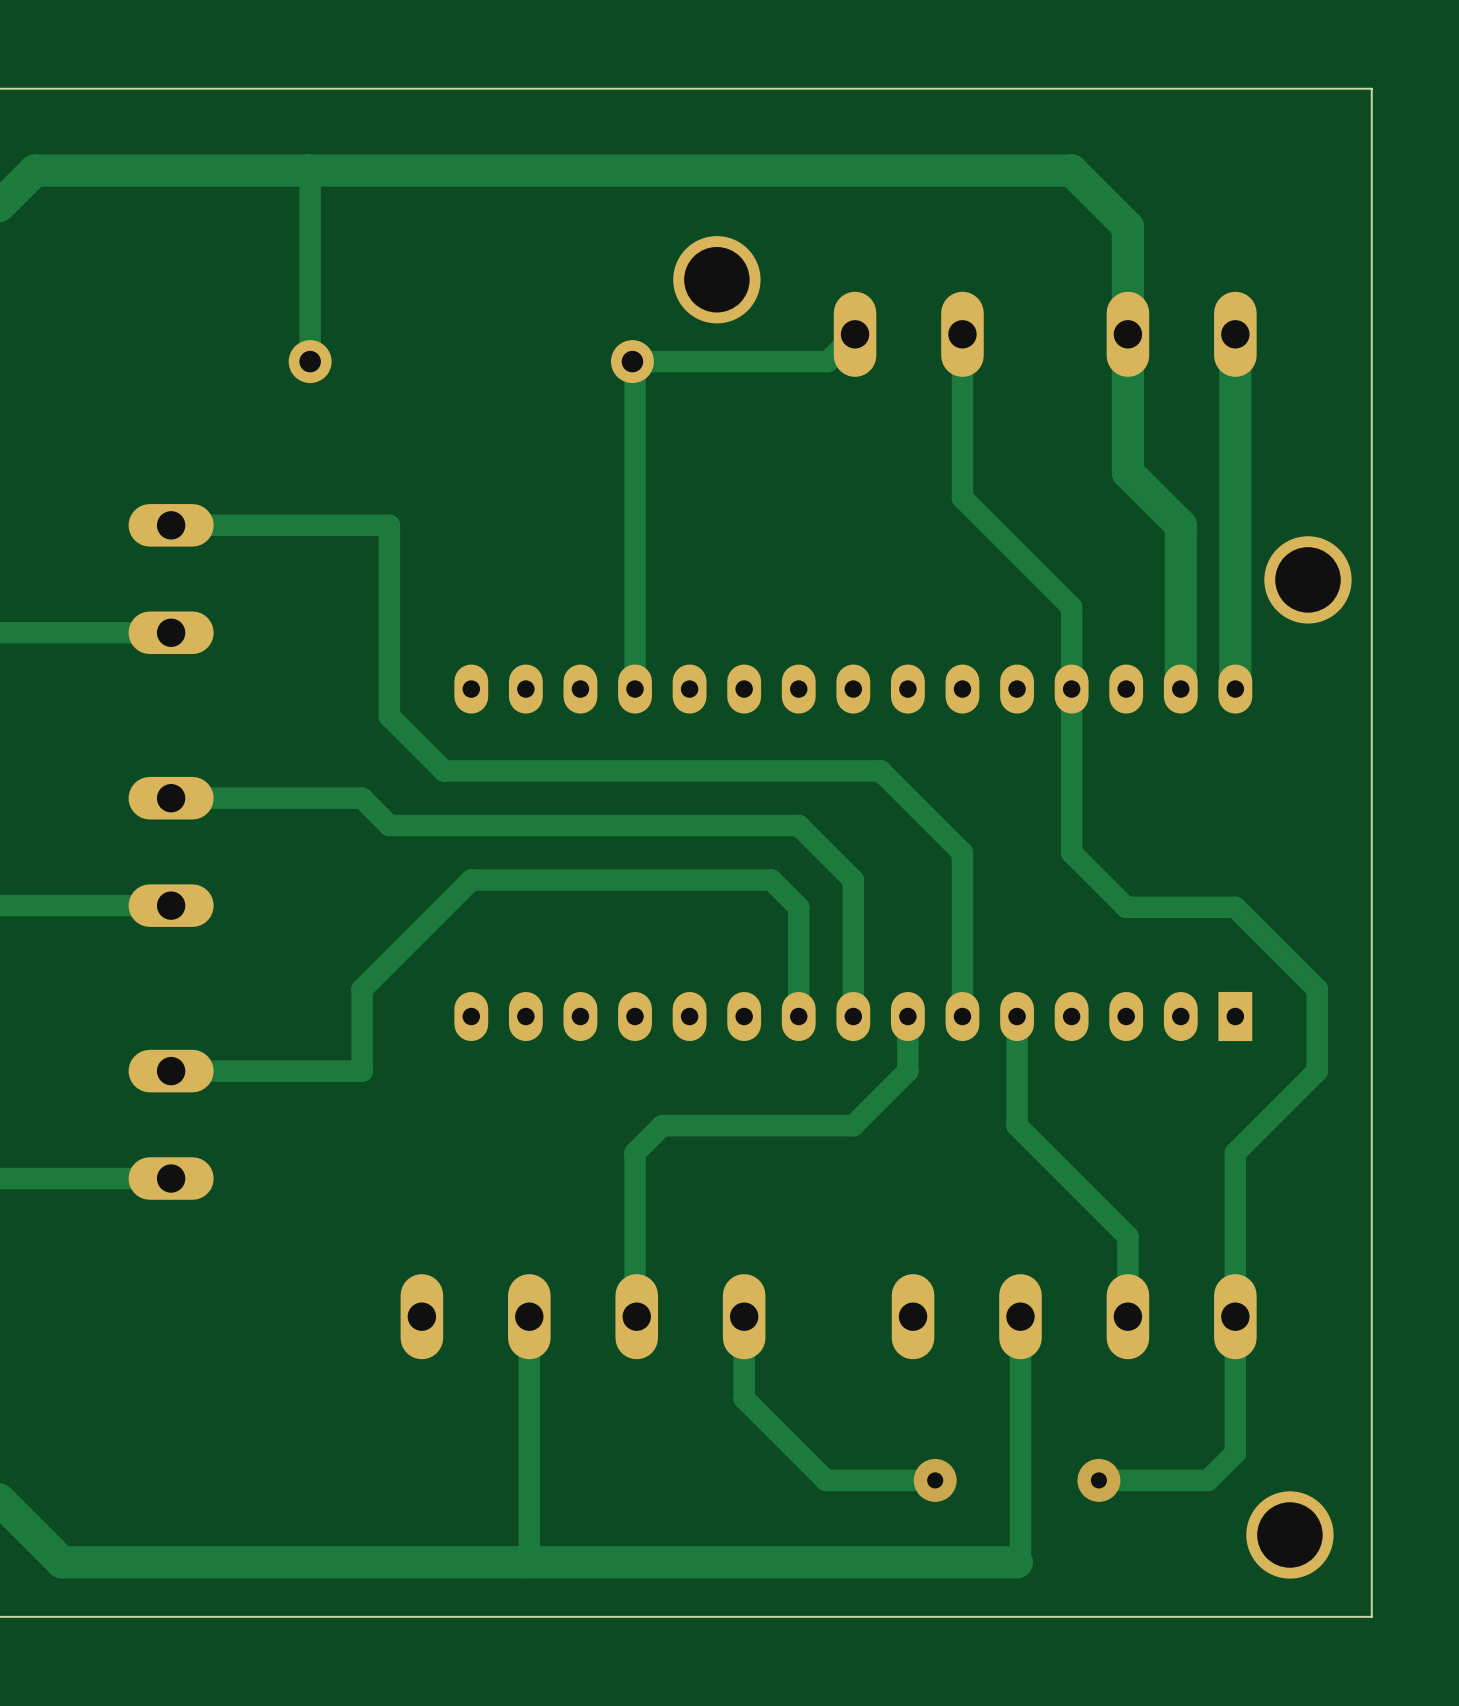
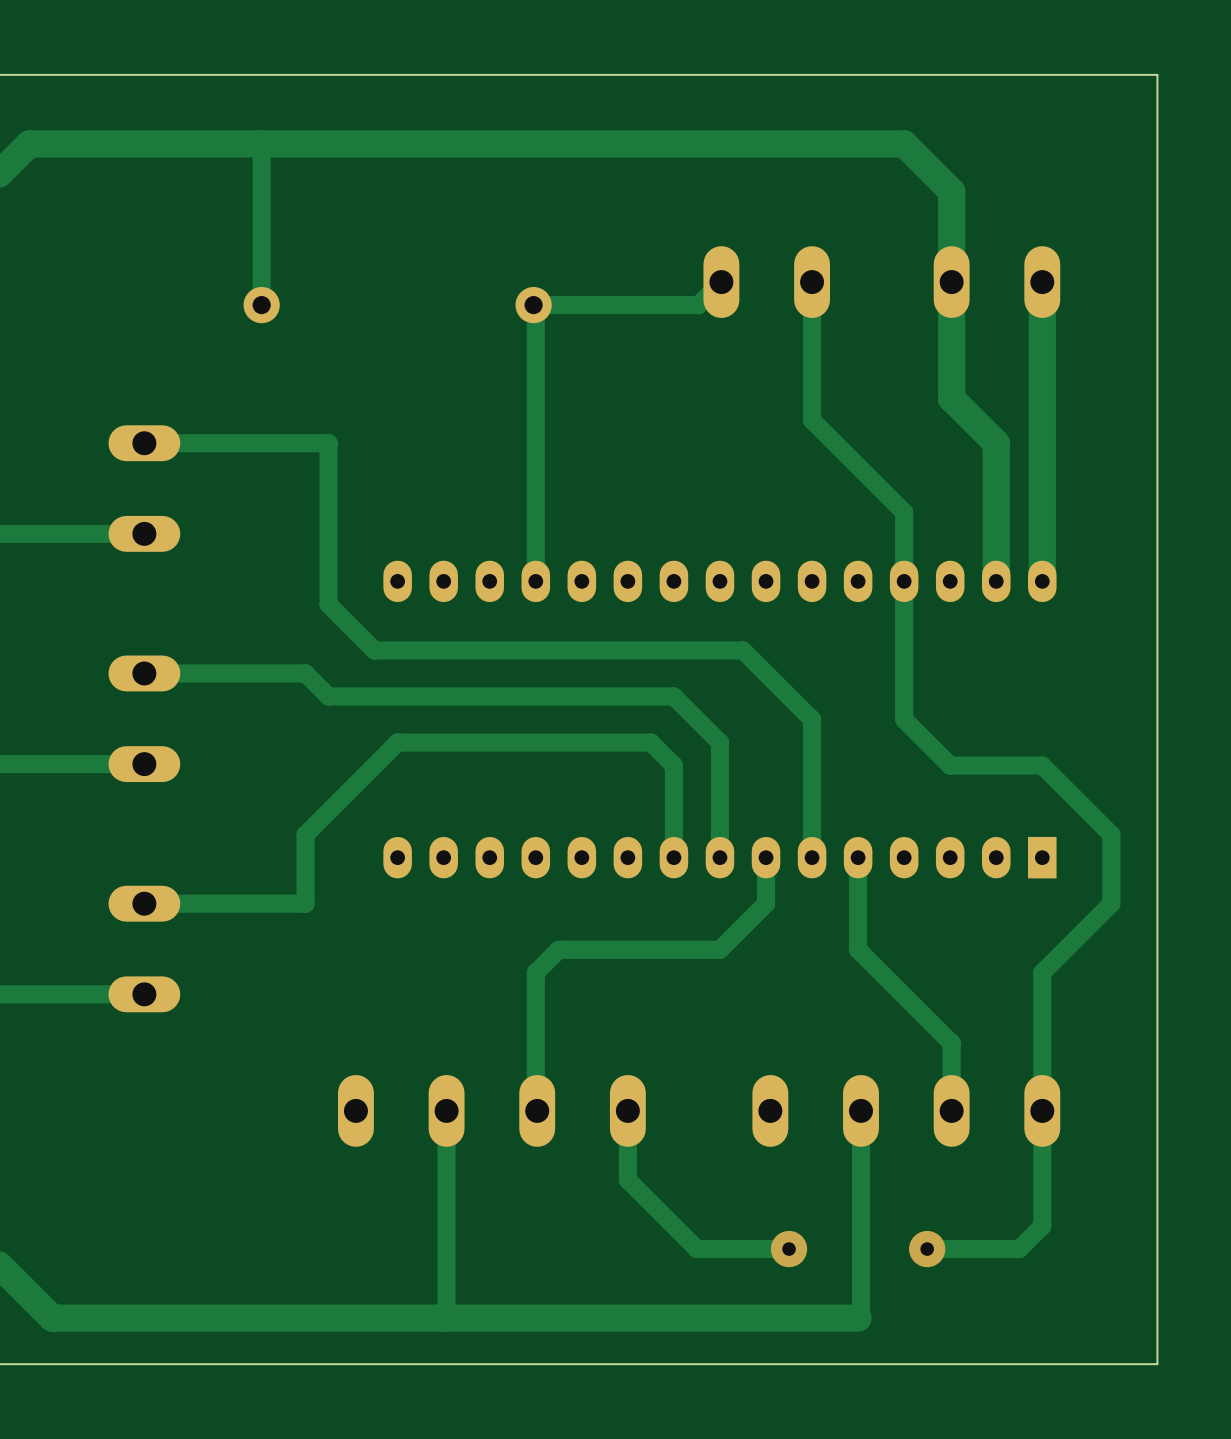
part: (716, 279) -> none
part: (1307, 579) -> none
part: (1289, 1534) -> none

